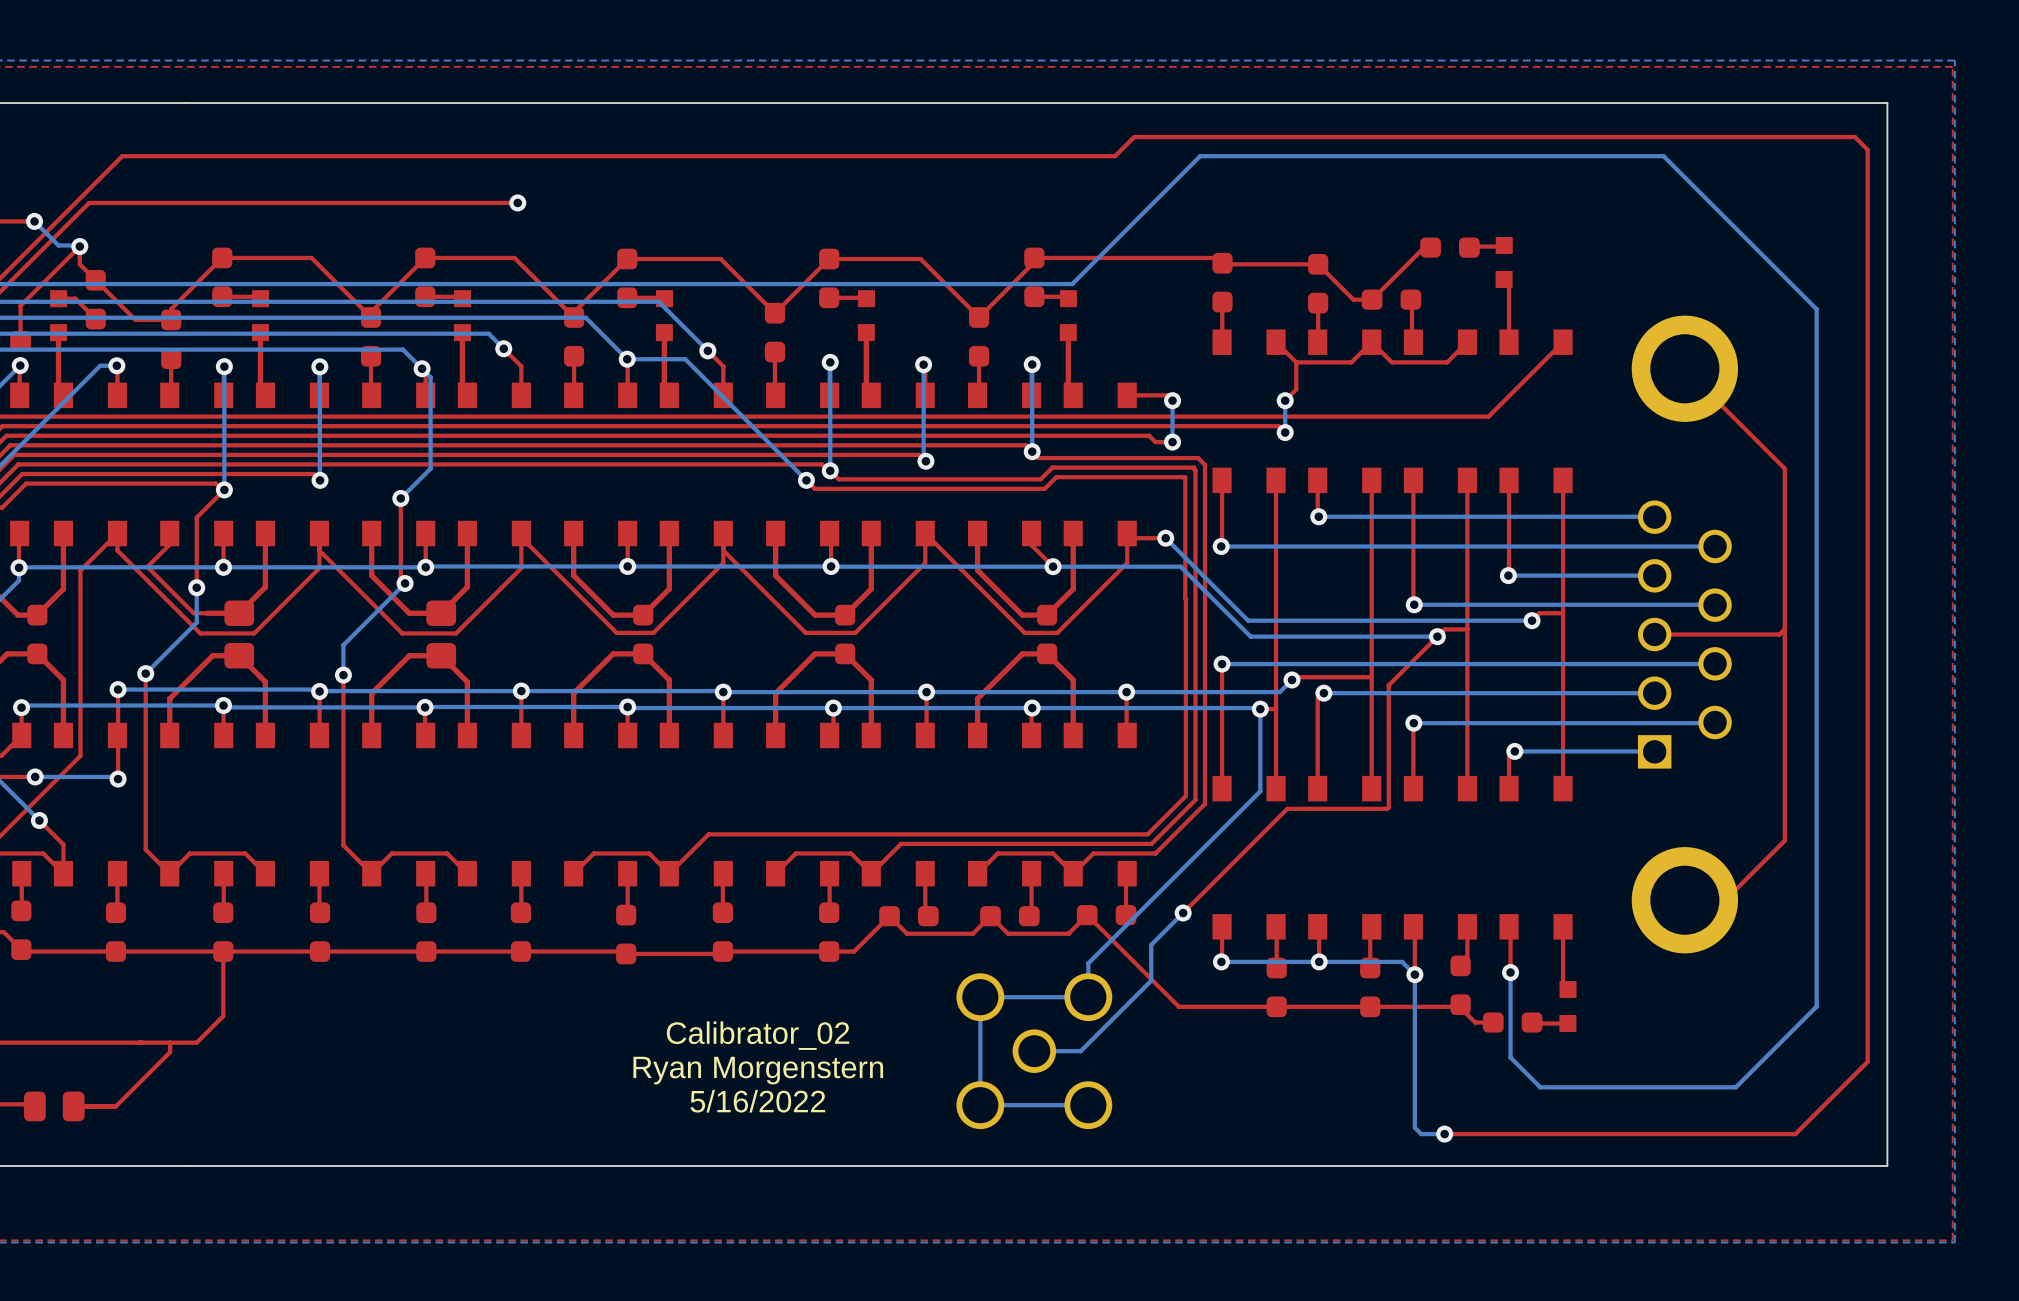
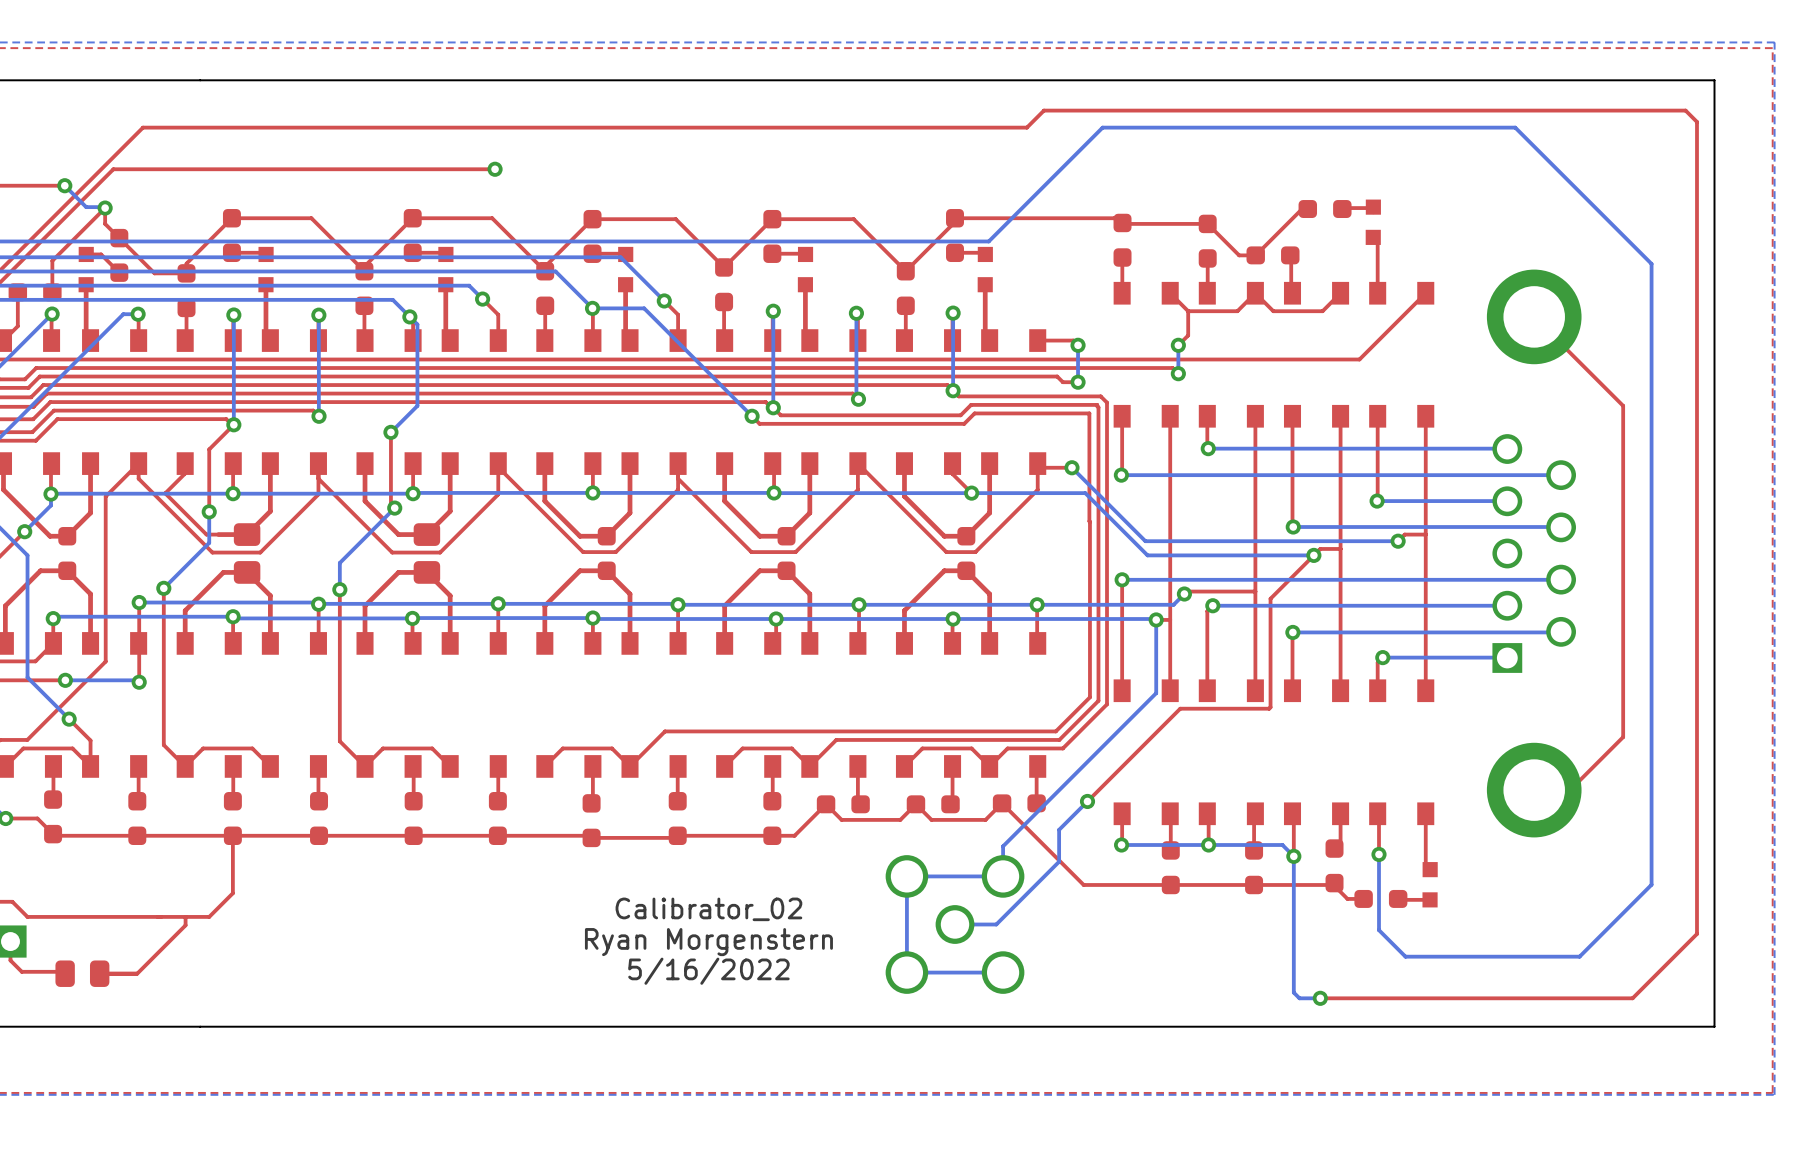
top track: (1784, 629) (1779, 634) (1654, 634) -> none

